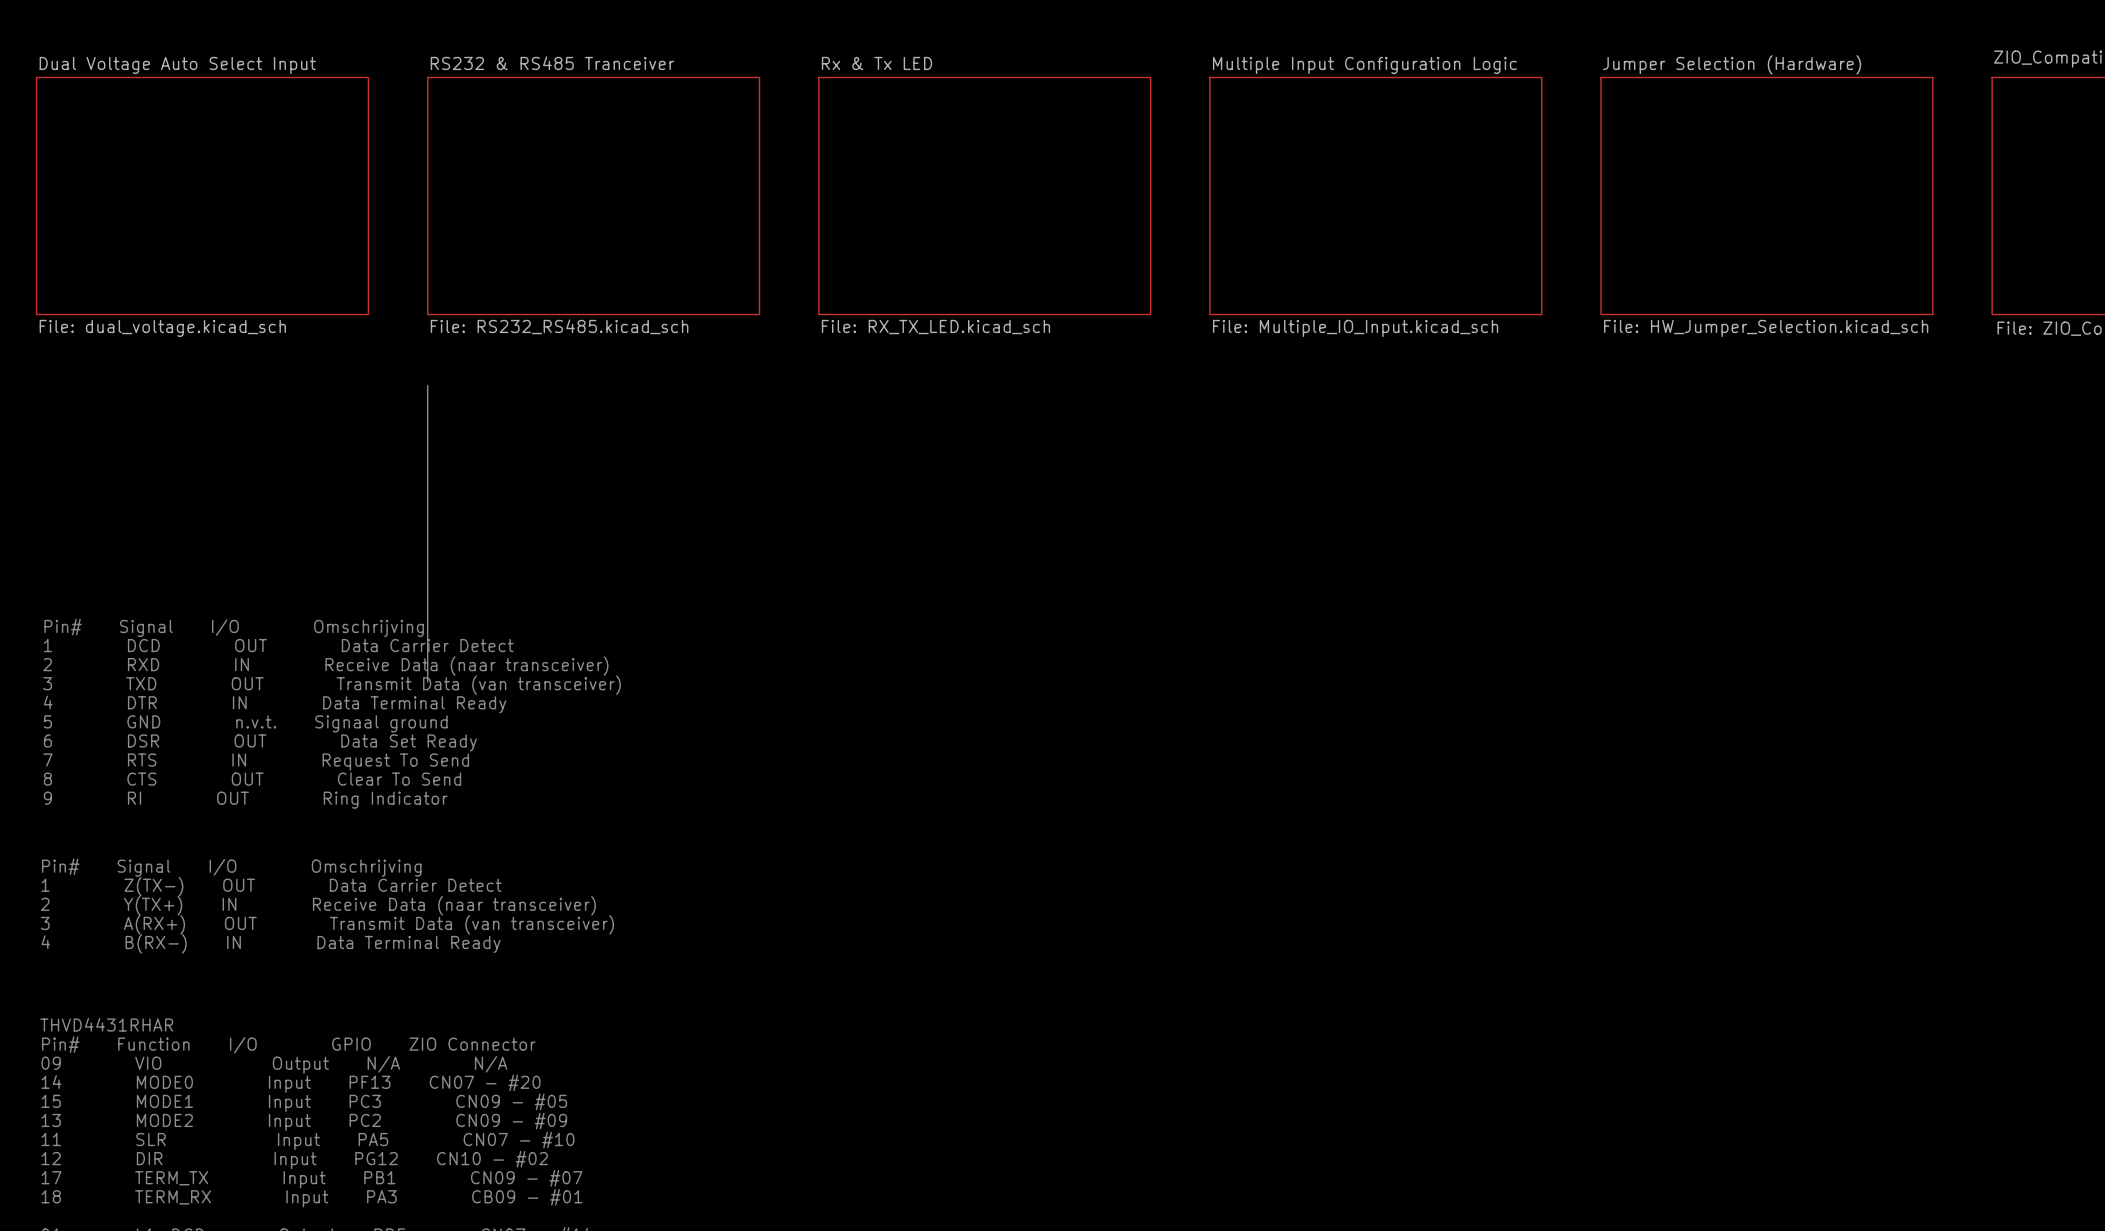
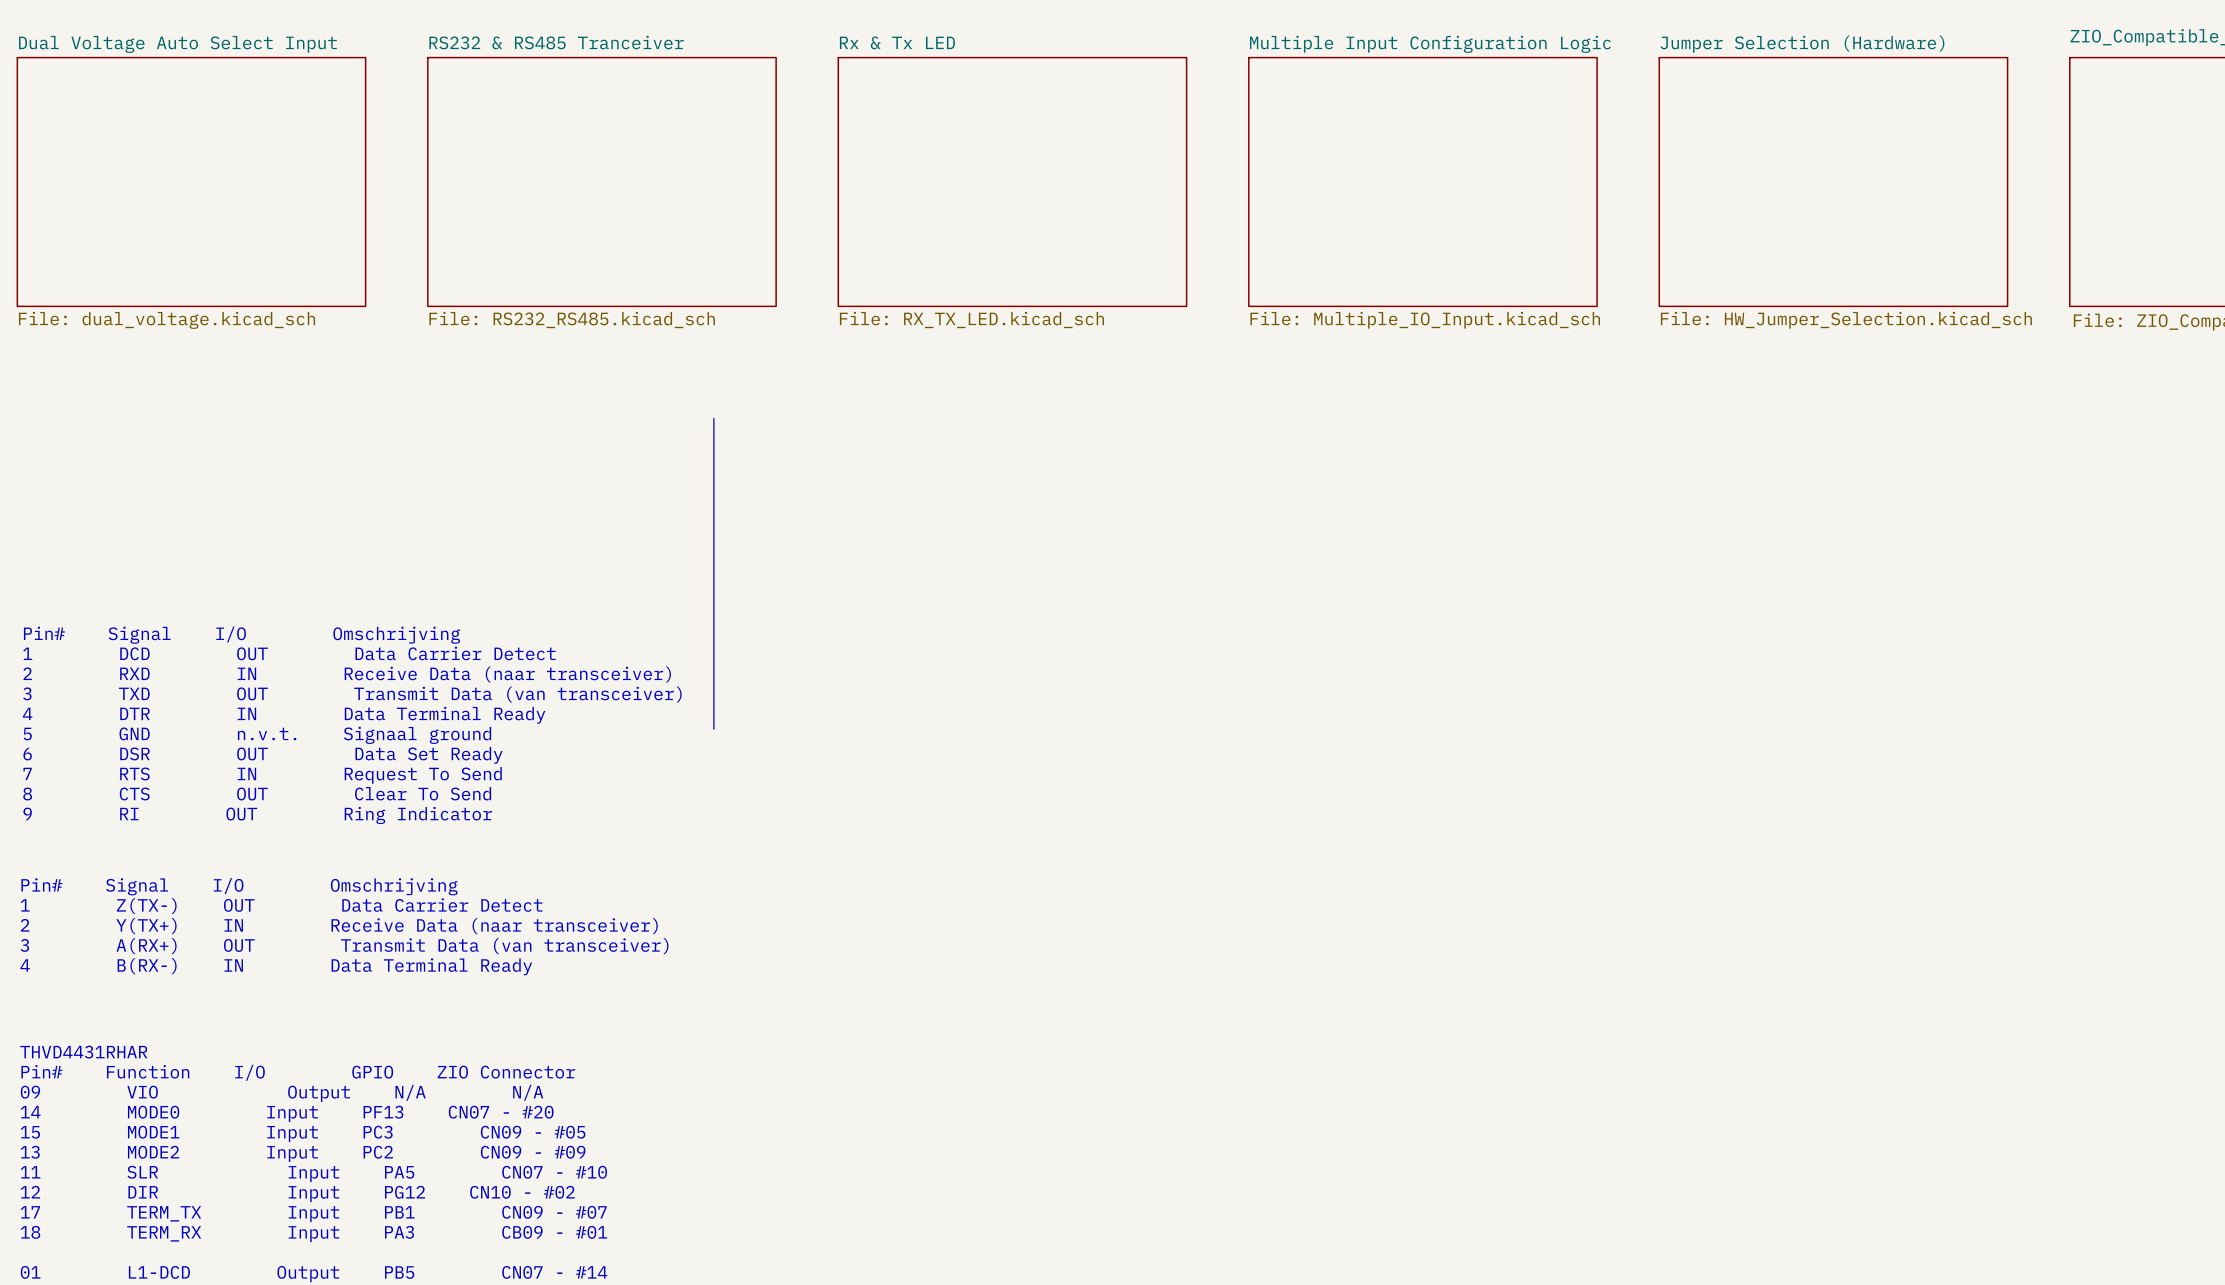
line: (427, 385) (427, 681) -> none
line: none -> (713, 418) (713, 729)

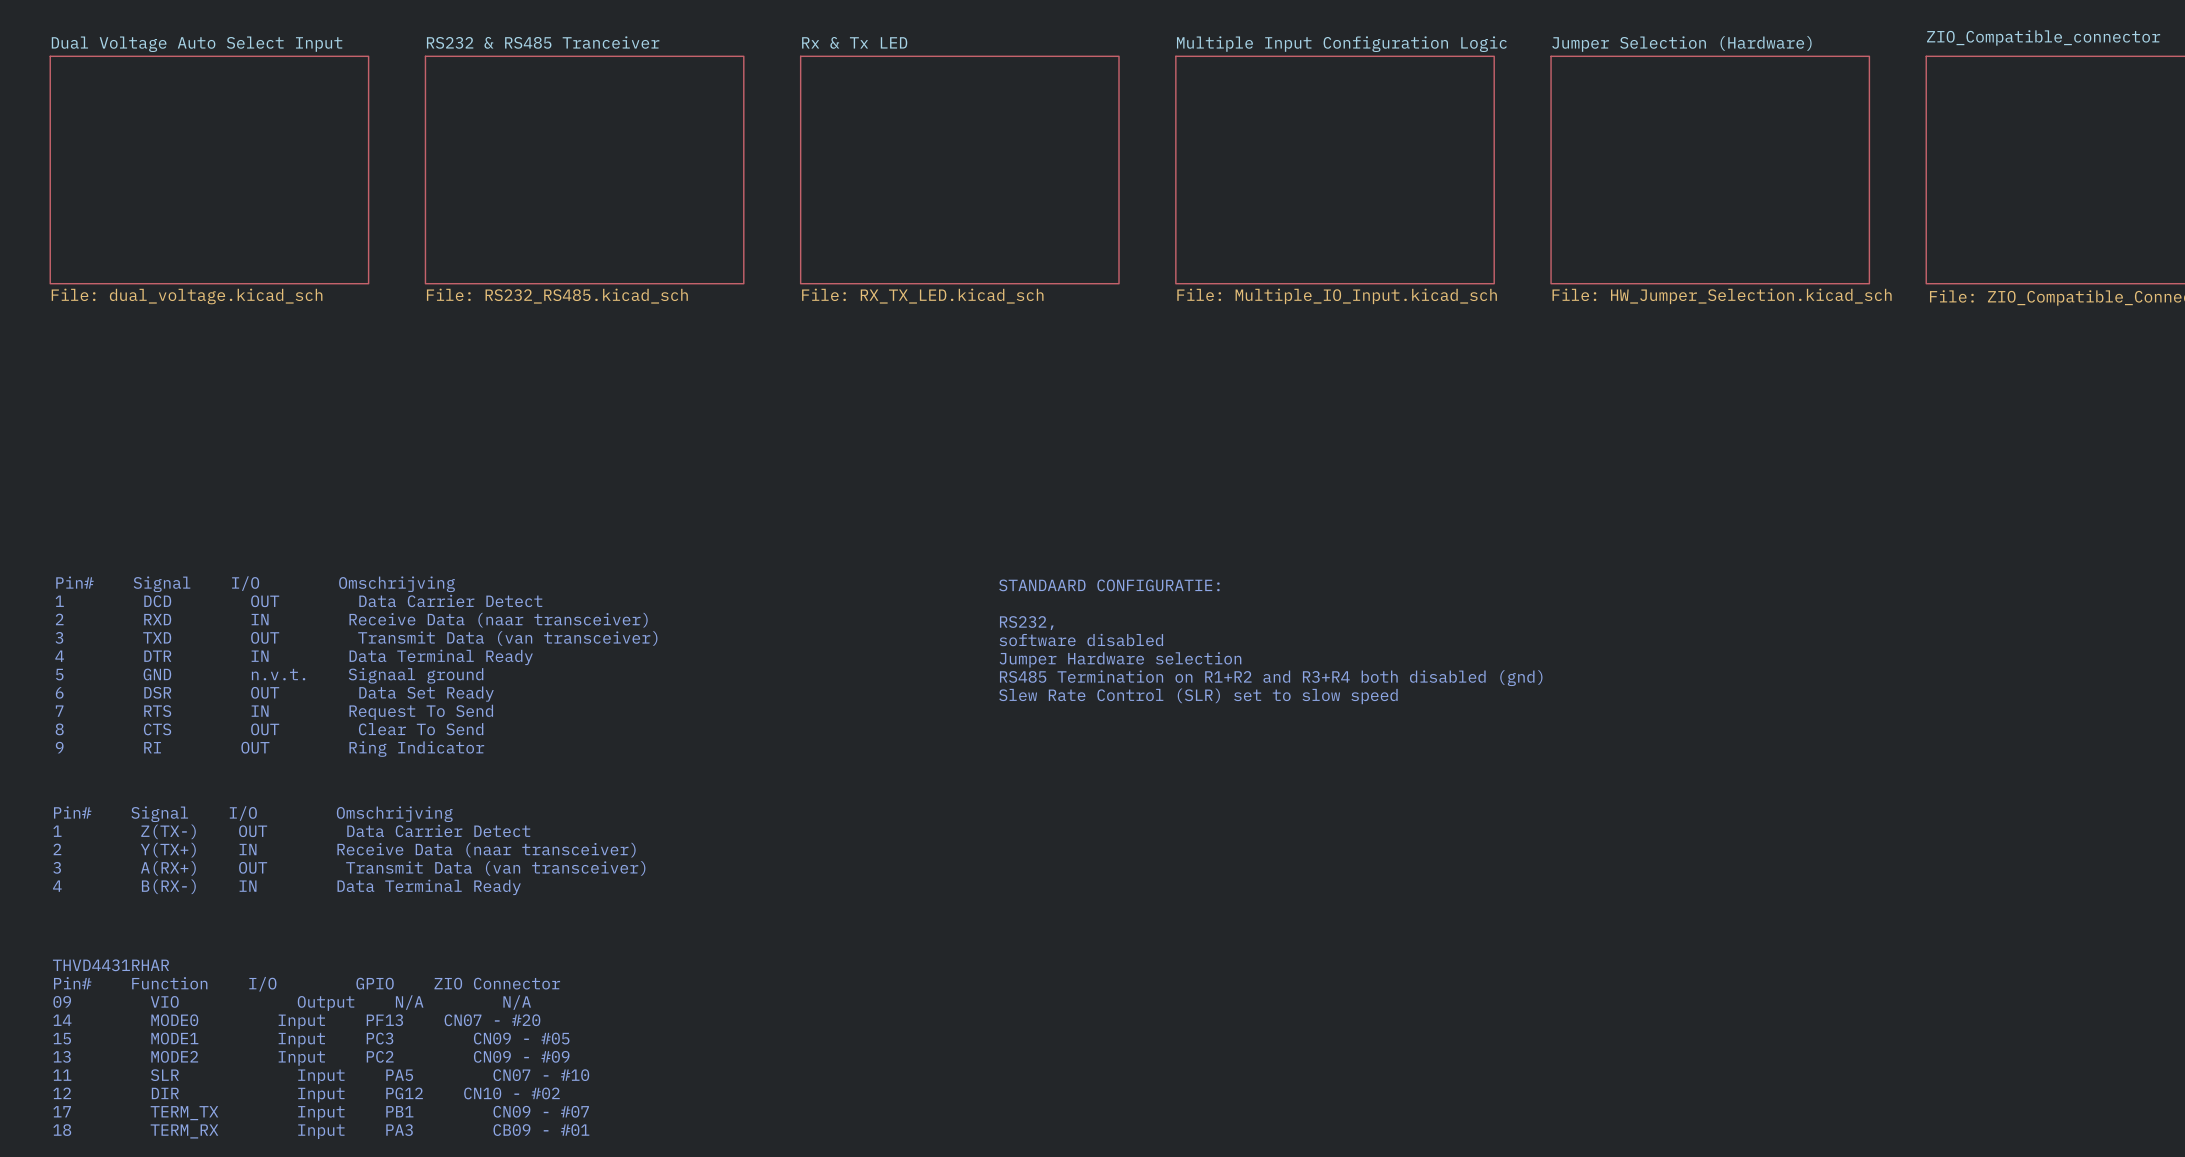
line: (713, 418) (713, 729) -> none
text: none -> STANDAARD CONFIGURATIE: (1109, 585)
text: none -> RS232, (1026, 623)
text: none -> software disabled (1081, 640)
text: none -> Jumper Hardware selection (1120, 659)
text: none -> RS485 Termination on R1+R2 and R3+R4 both disabled (gnd) (1271, 678)
text: none -> Slew Rate Control (SLR) set to slow speed (1198, 696)

